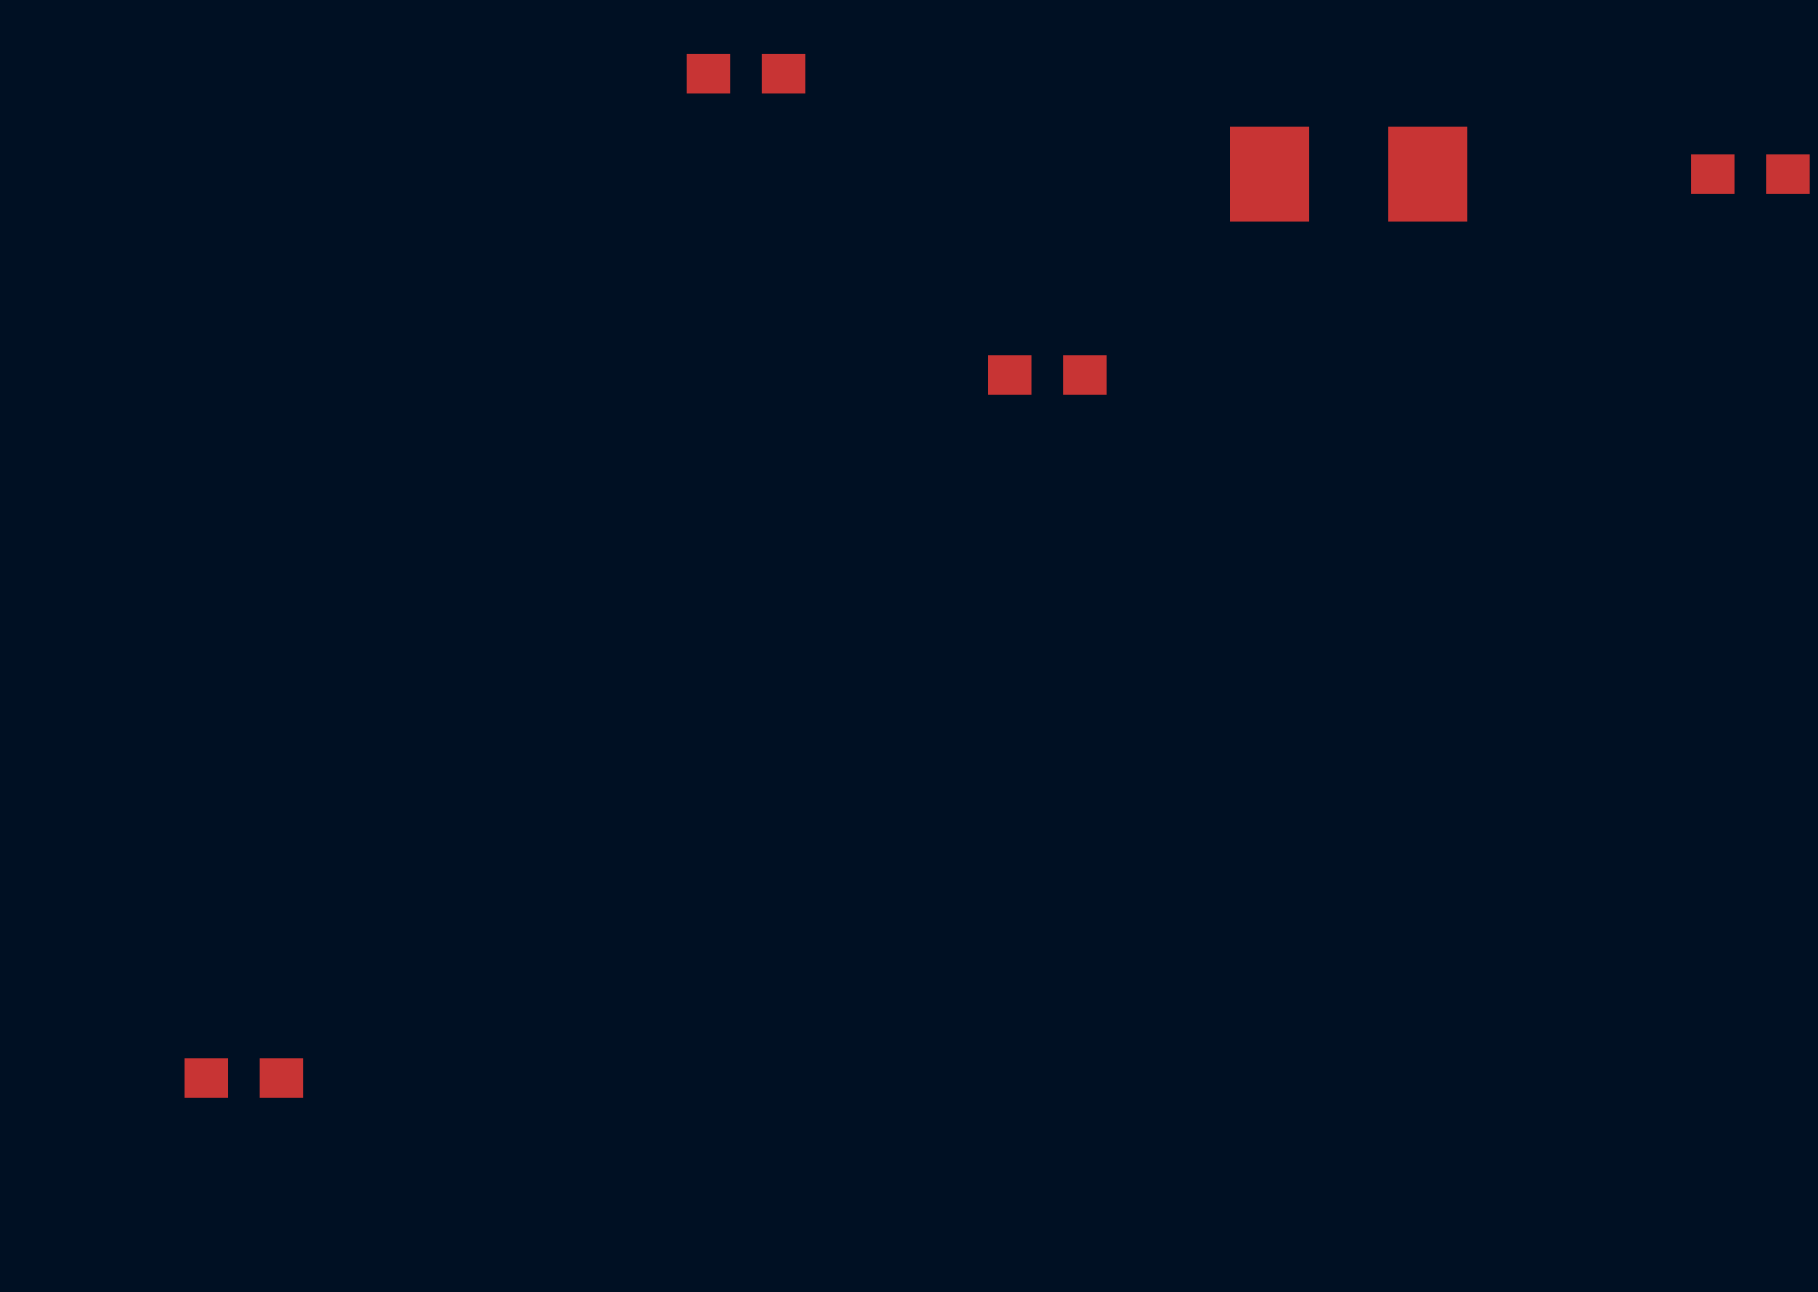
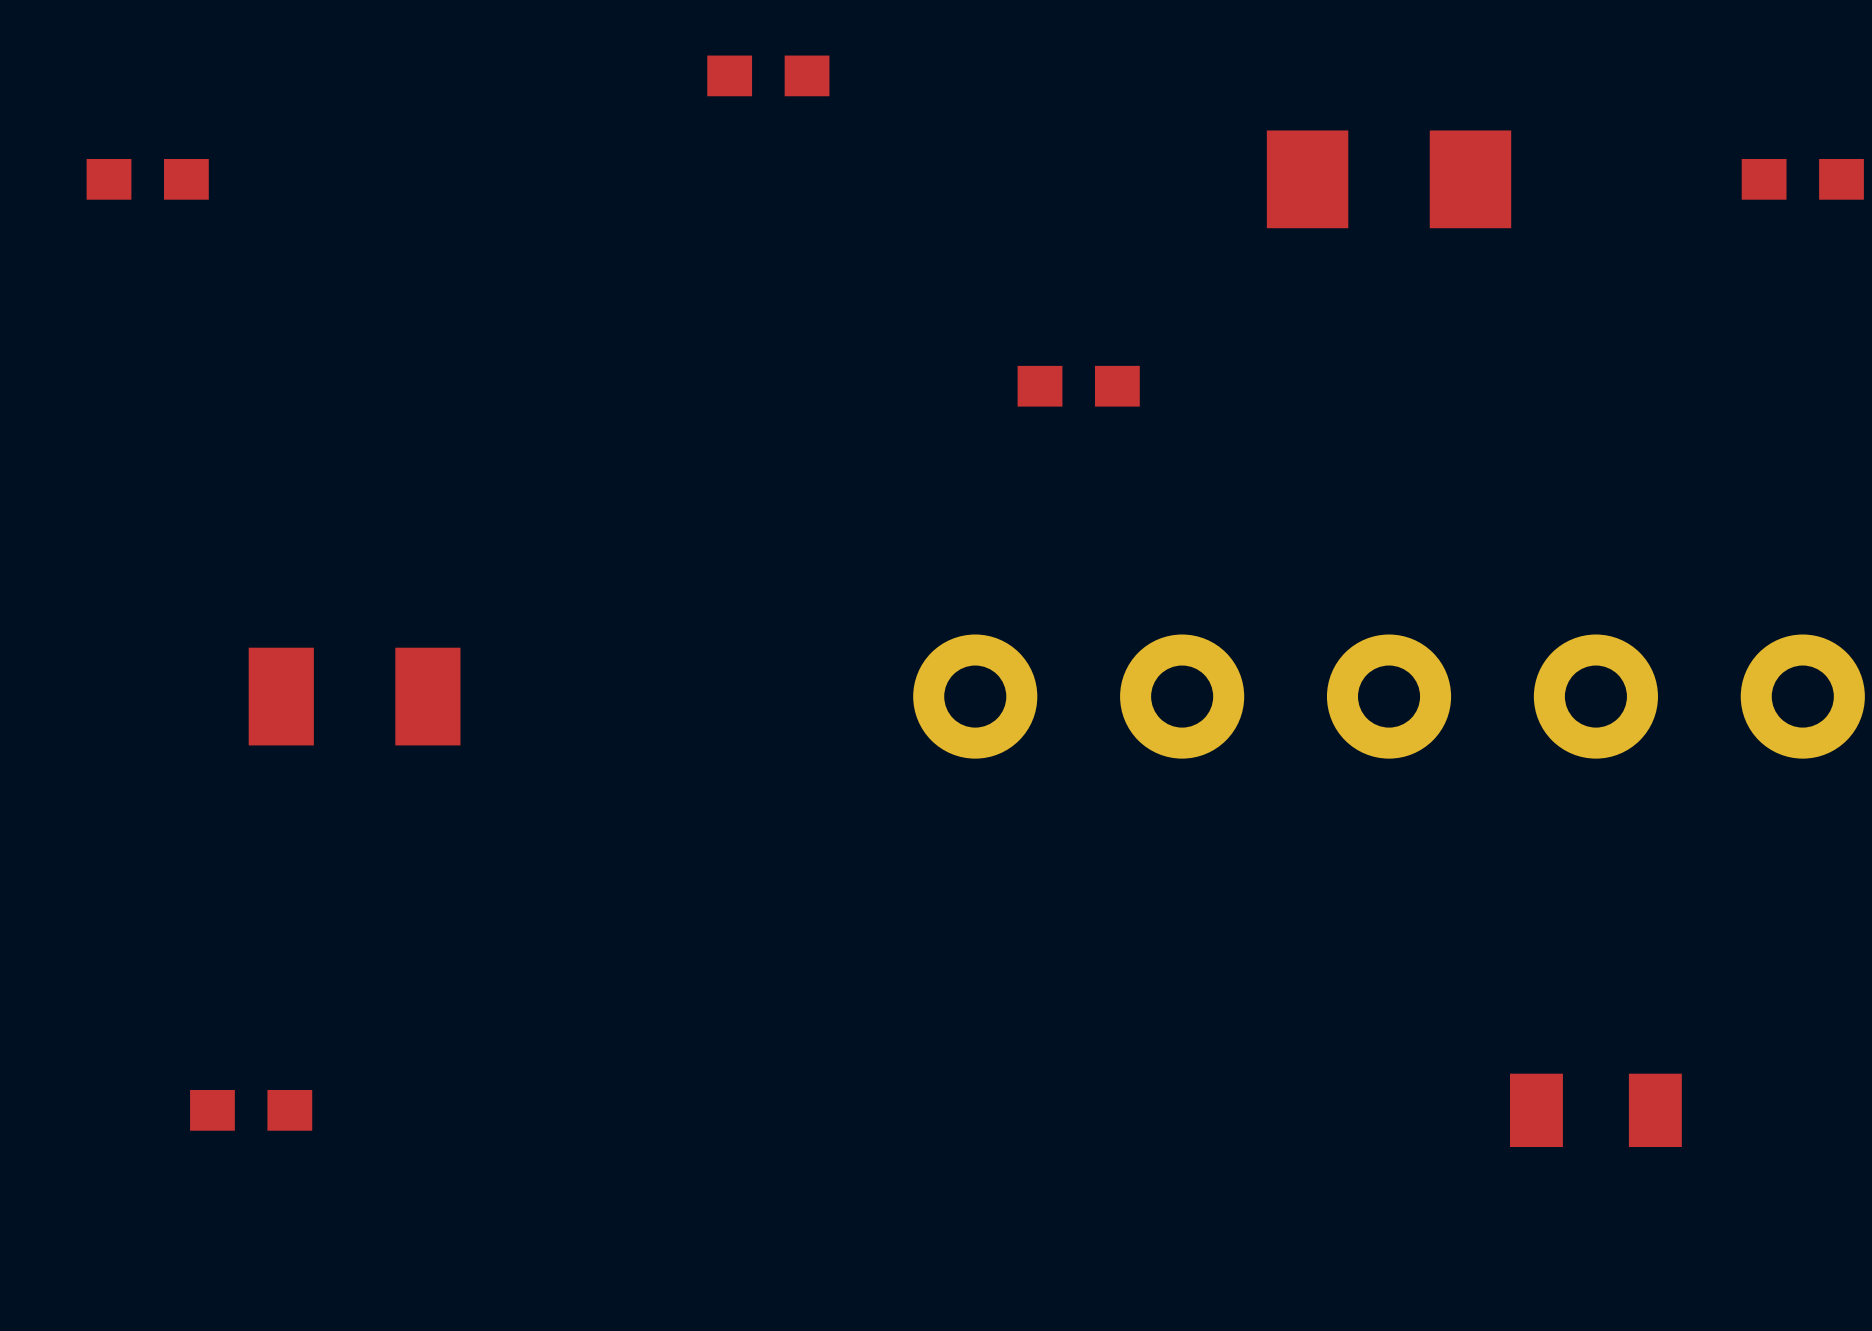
part: none -> (147, 179)
part: none -> (354, 696)
part: none -> (1389, 696)
part: none -> (1595, 1110)

